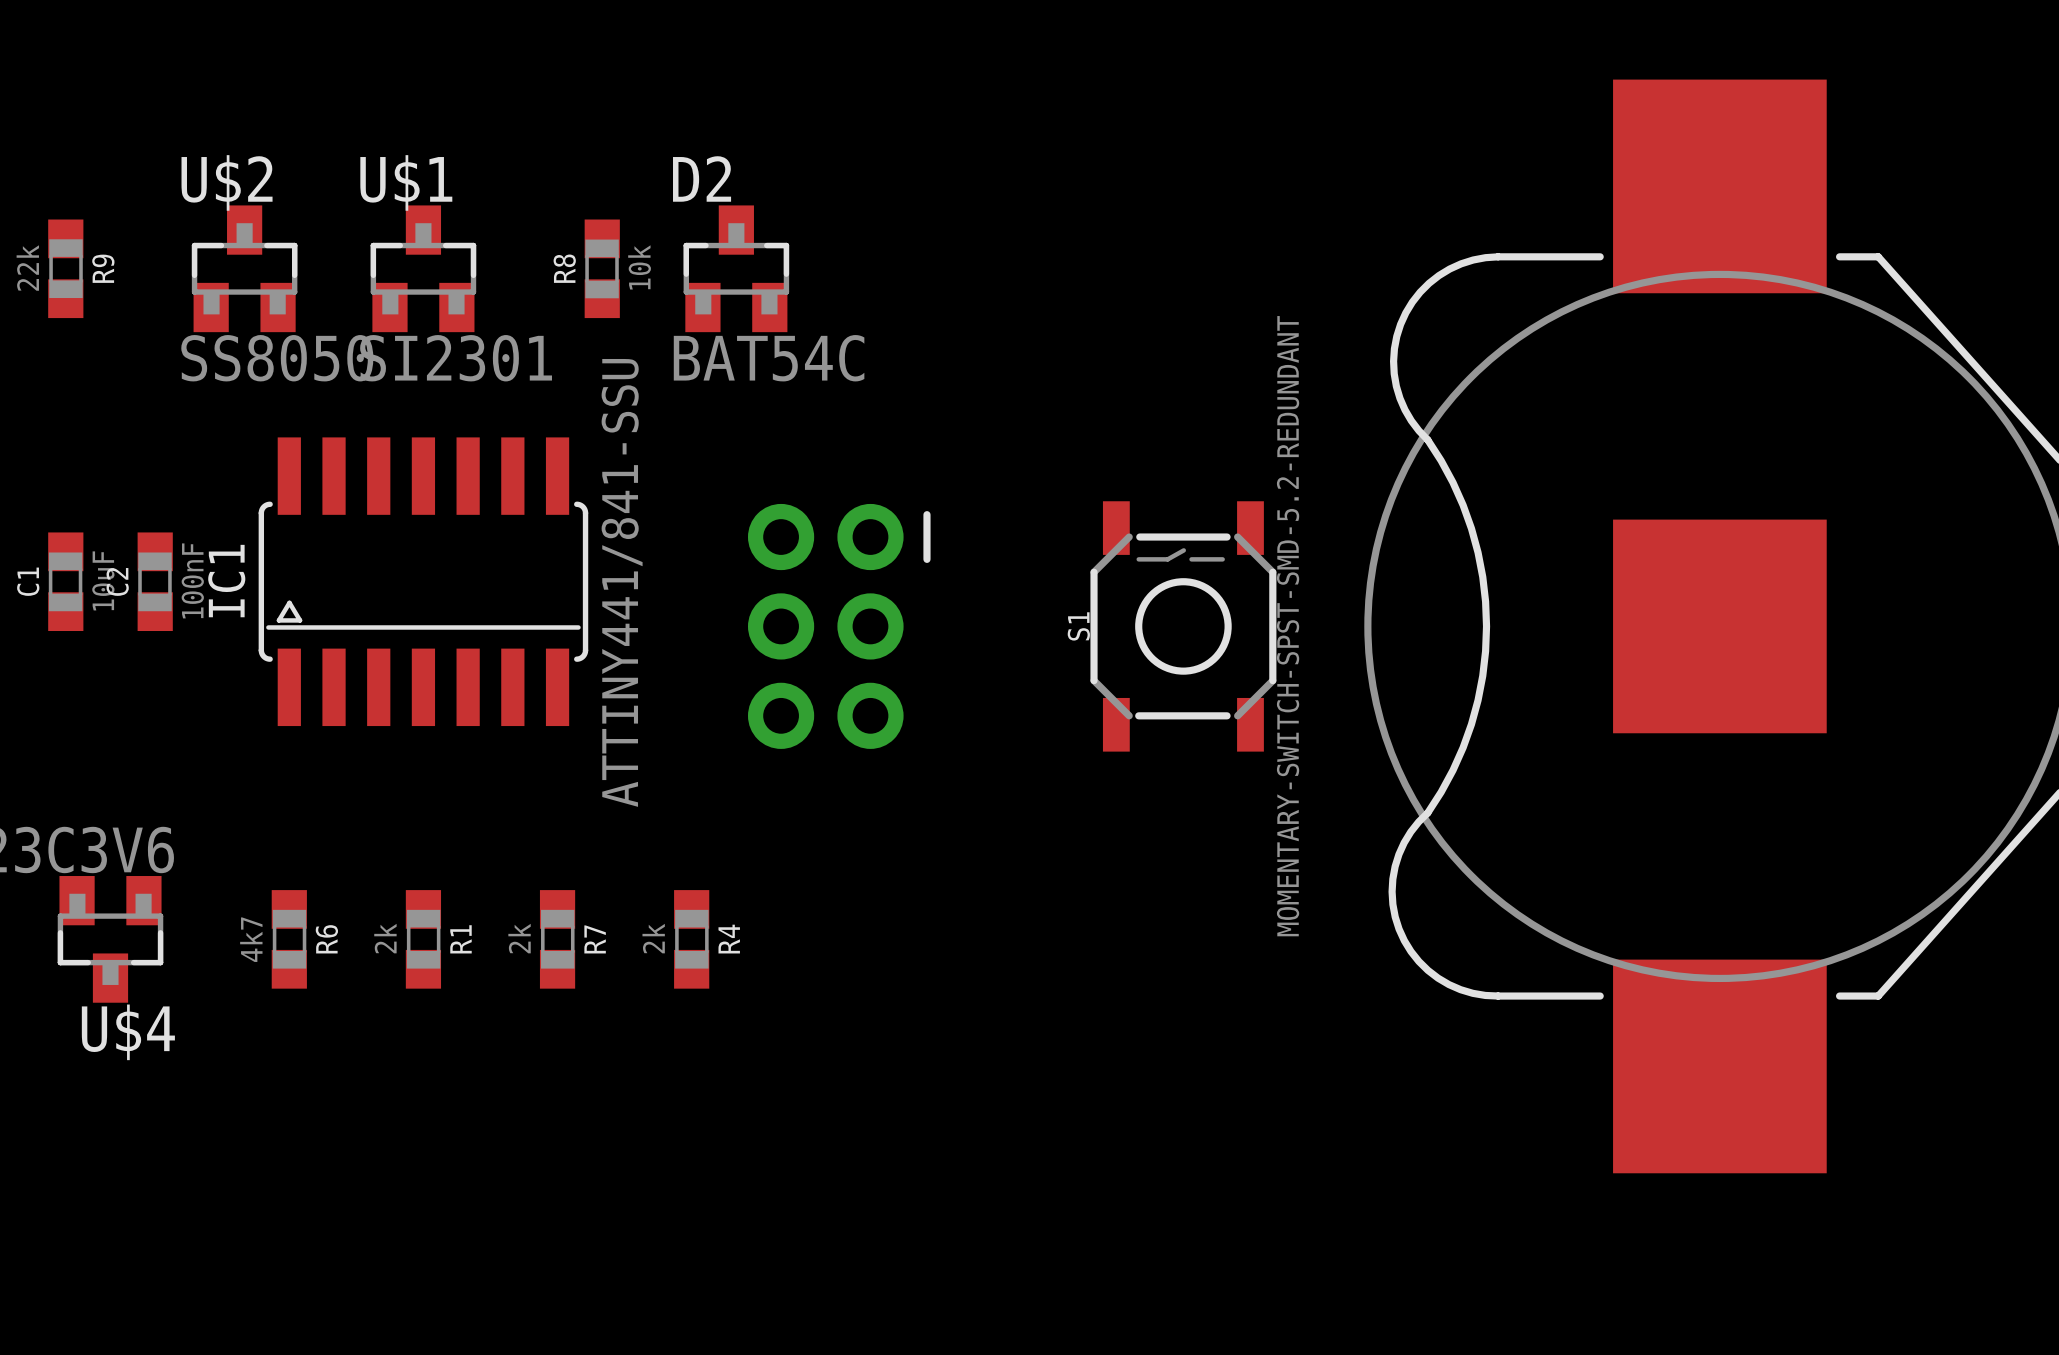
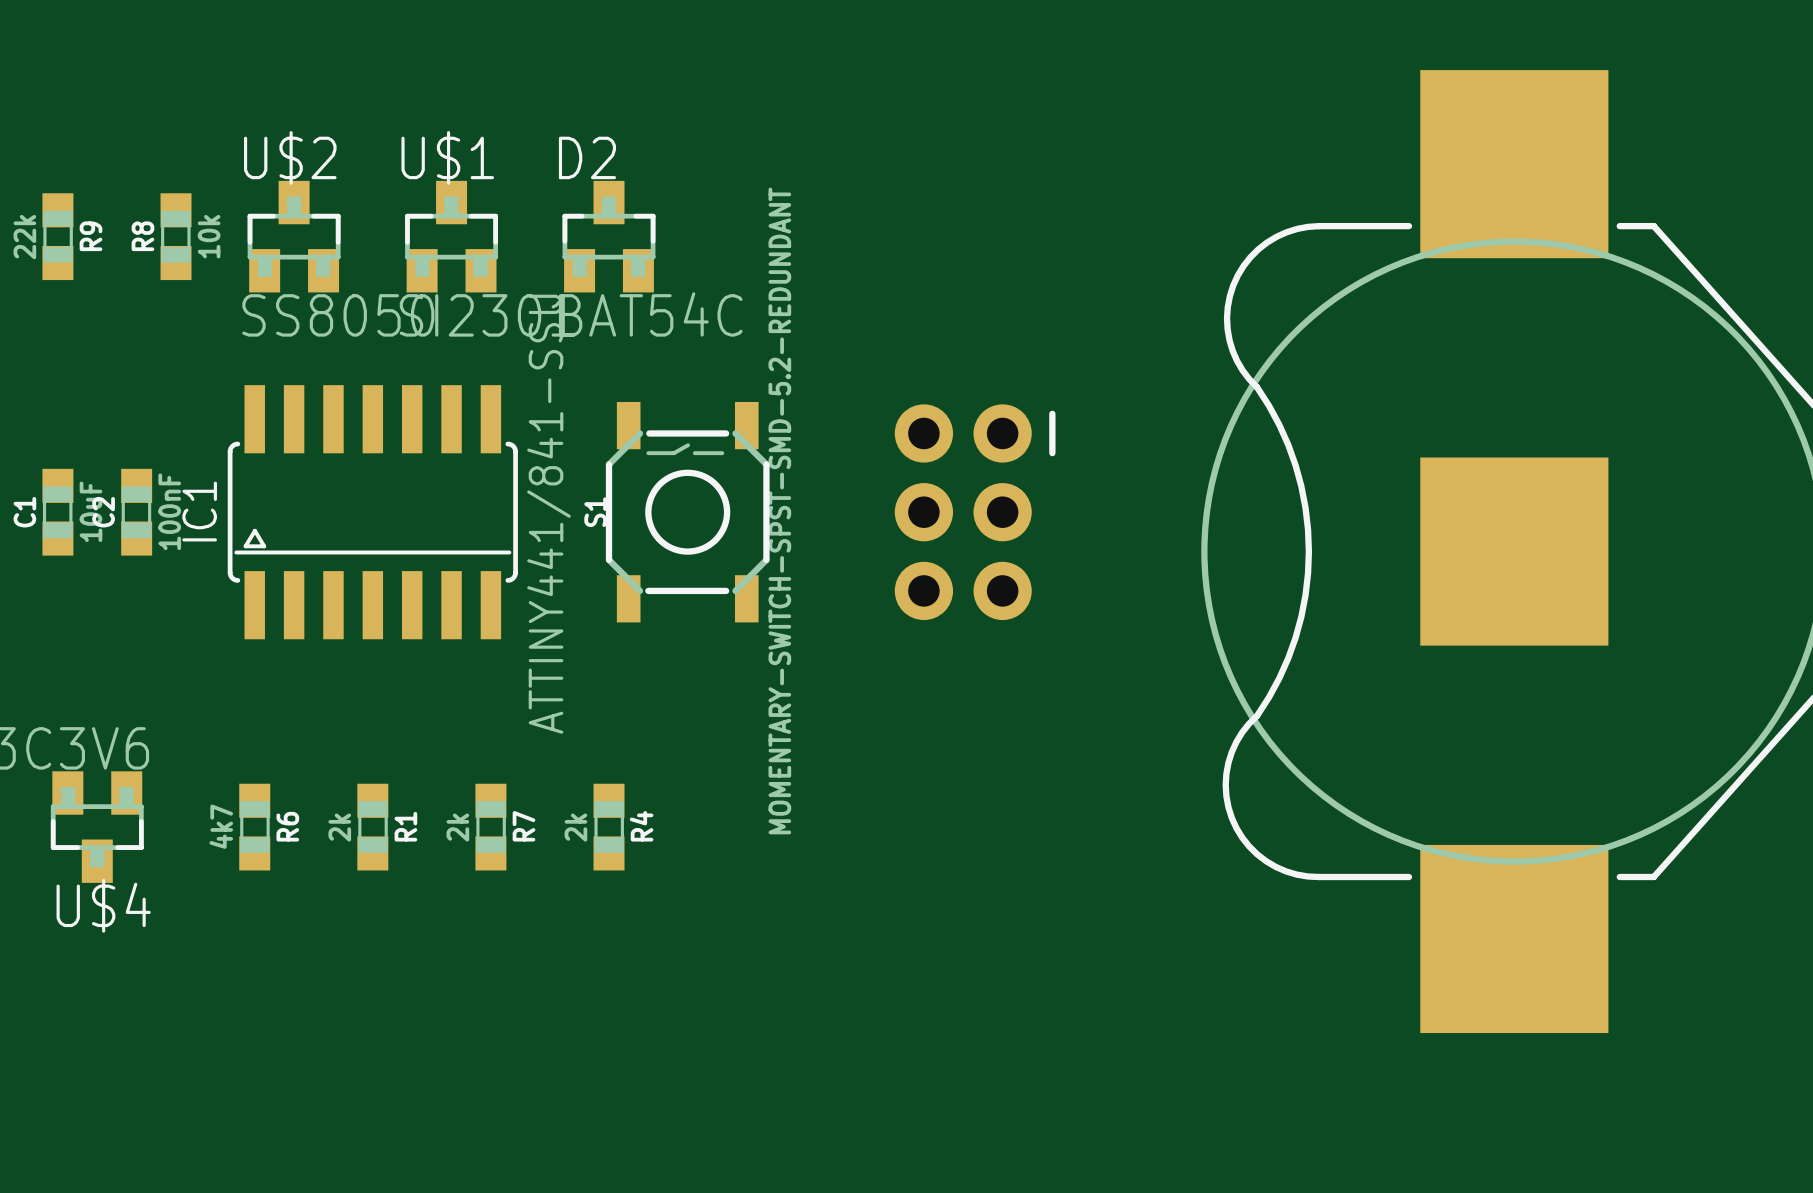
U$2 position: (244, 268) -> (294, 236)
U$1 position: (423, 268) -> (451, 236)
R8 position: (602, 268) -> (176, 236)
D2 position: (736, 268) -> (609, 236)
part position: (839, 626) -> (975, 512)
S1 position: (1183, 626) -> (687, 512)

